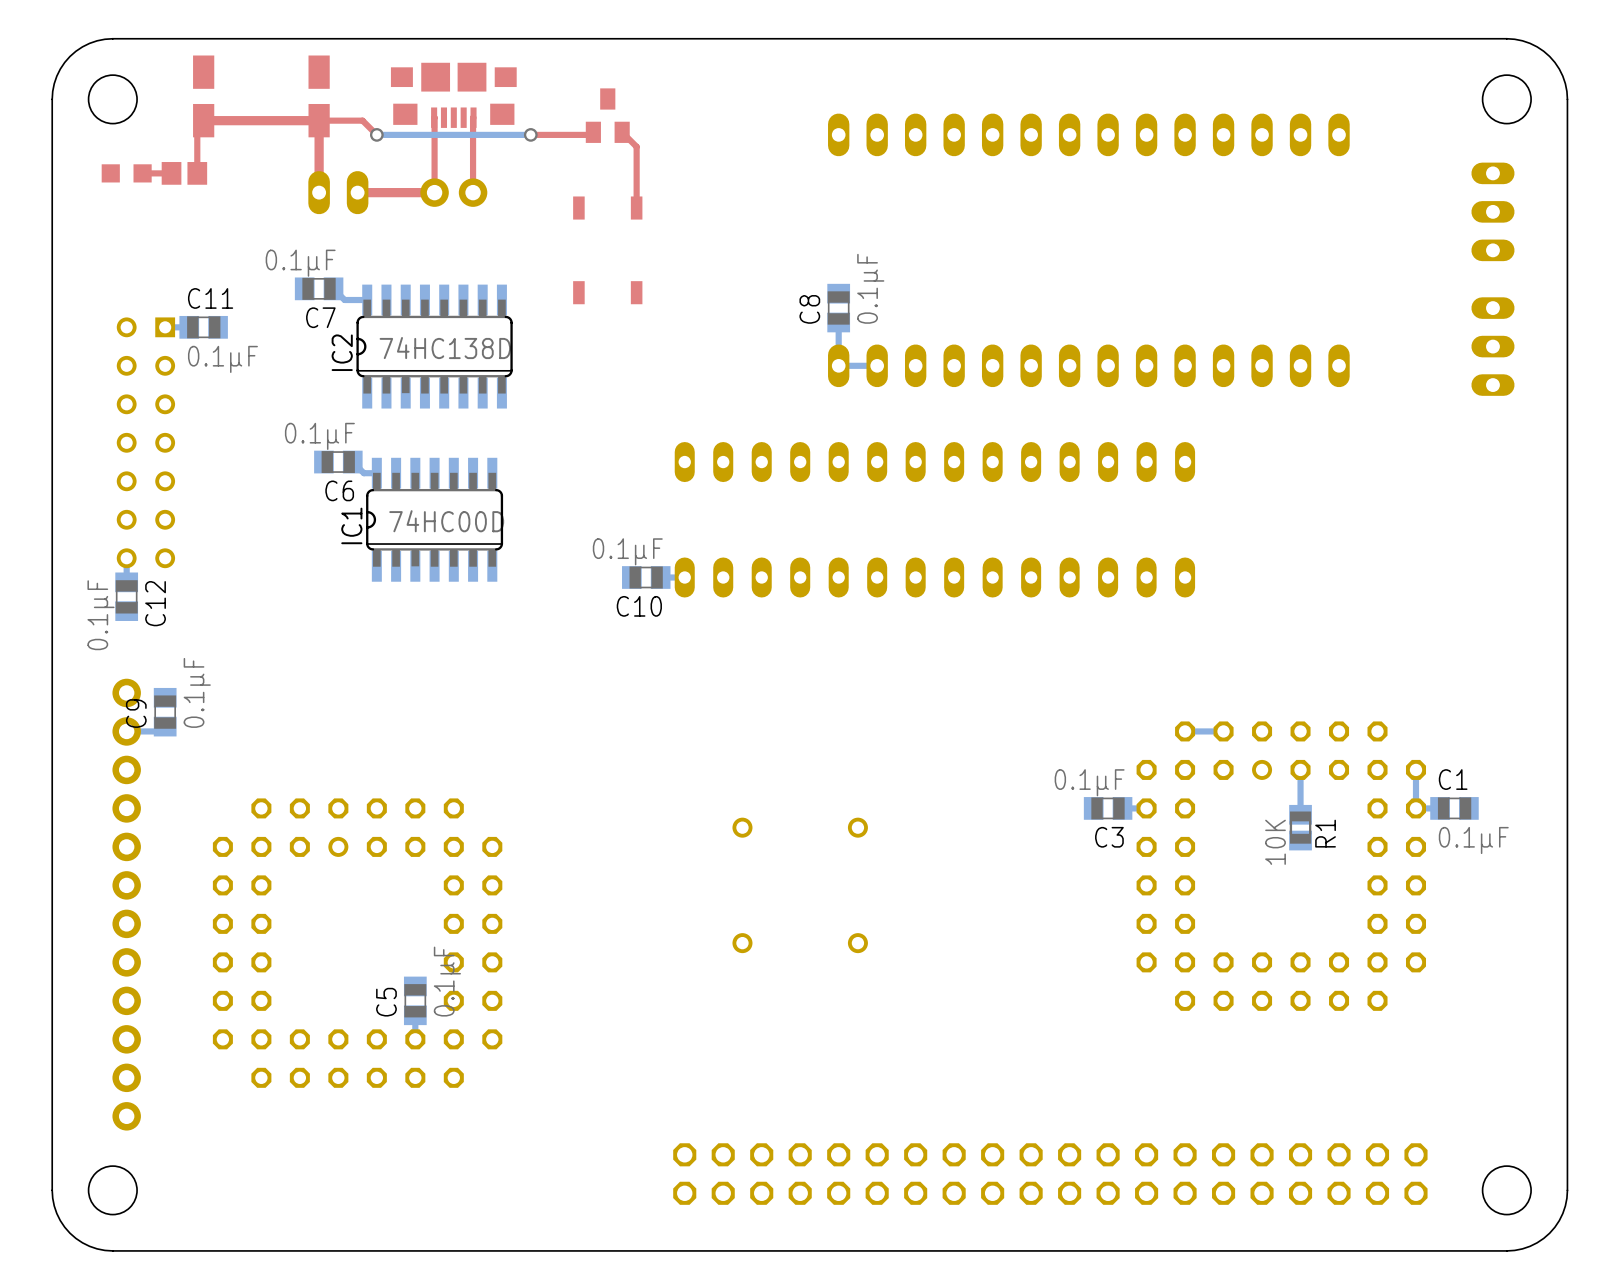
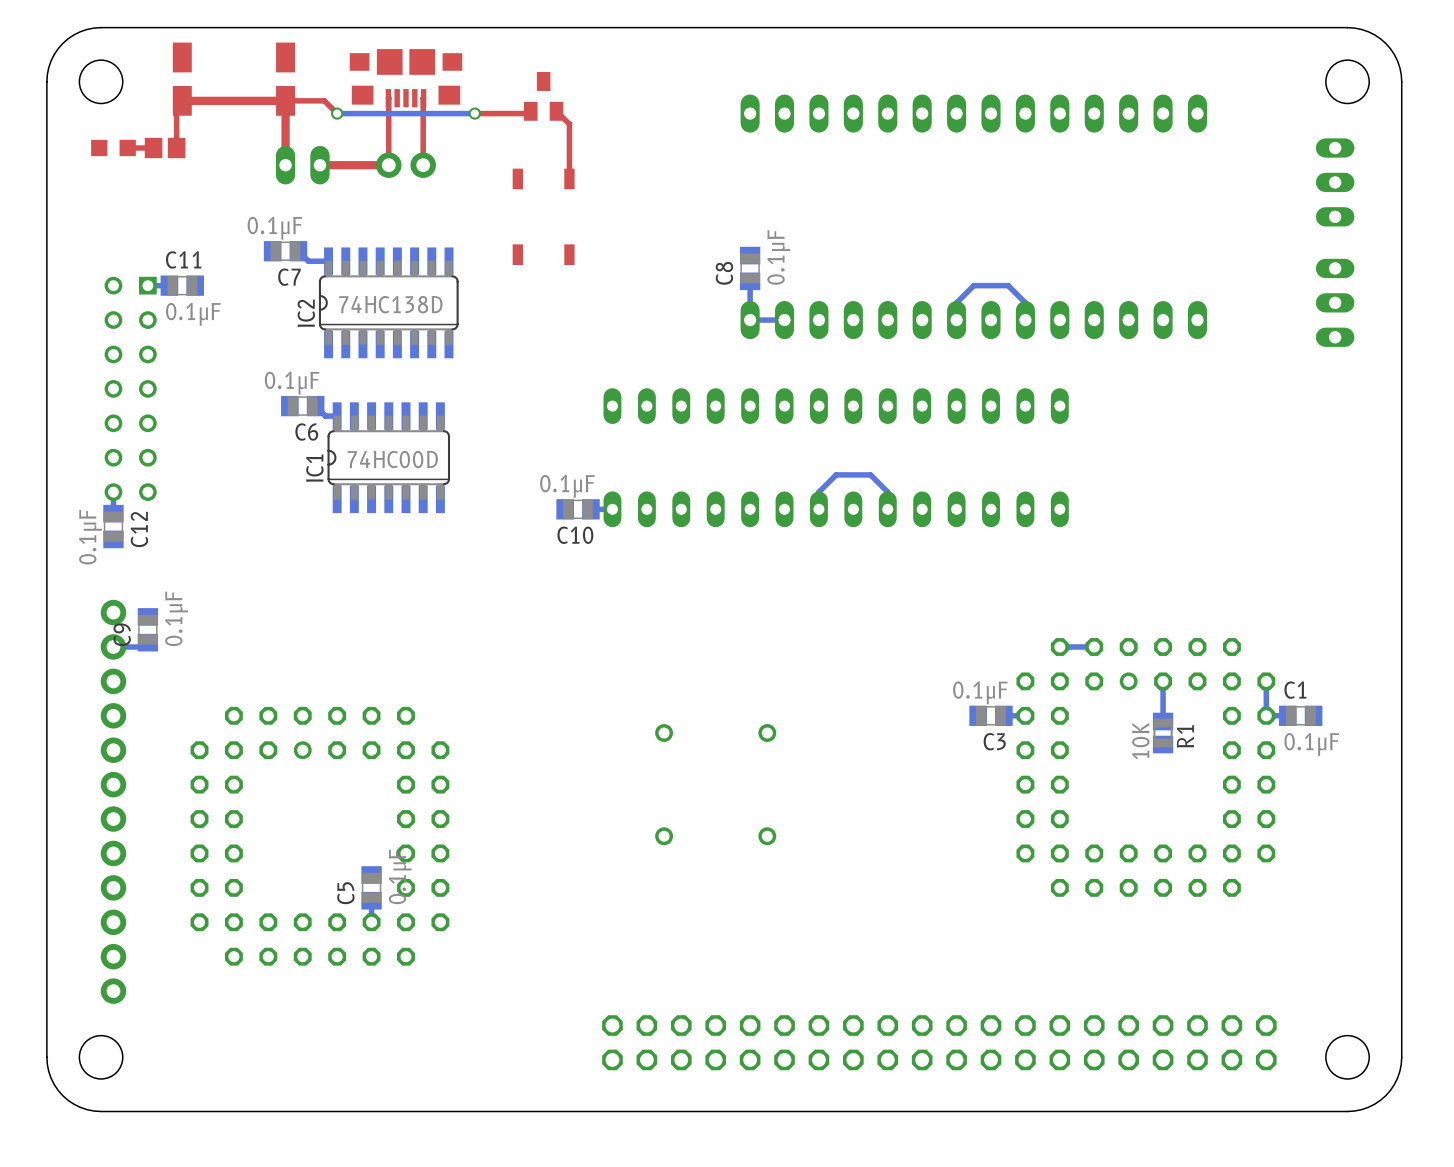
bottom track: none -> (1025, 320) (1025, 302) (1008, 285) (973, 285) (956, 302) (956, 320)
bottom track: none -> (887, 509) (887, 492) (870, 474) (836, 474) (818, 492) (818, 509)

